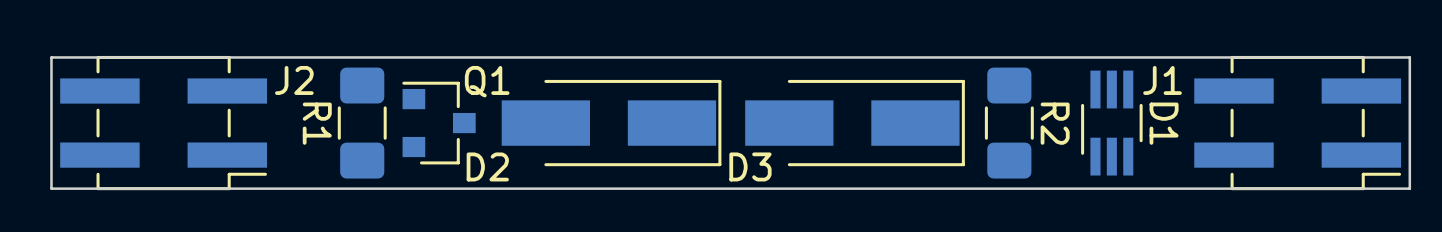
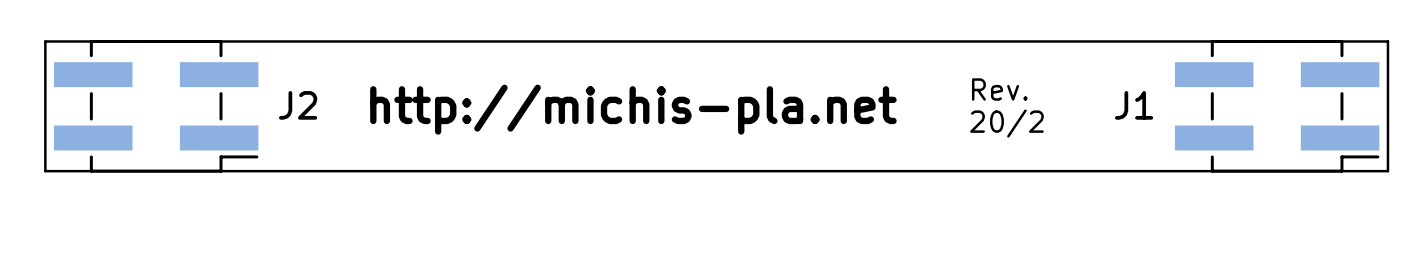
J2 name position: J2 (294, 80) -> J2 (298, 105)
J1 name position: J1 (1162, 80) -> J1 (1134, 105)
text: none -> Rev. (999, 89)
R1: (362, 123) -> none
Q1: (438, 123) -> none
D2: (611, 123) -> none
D3: (855, 123) -> none
R2: (1009, 123) -> none
D1: (1111, 123) -> none
text: none -> http://michis-pla.net (633, 109)
text: none -> 20/2 (1006, 123)

